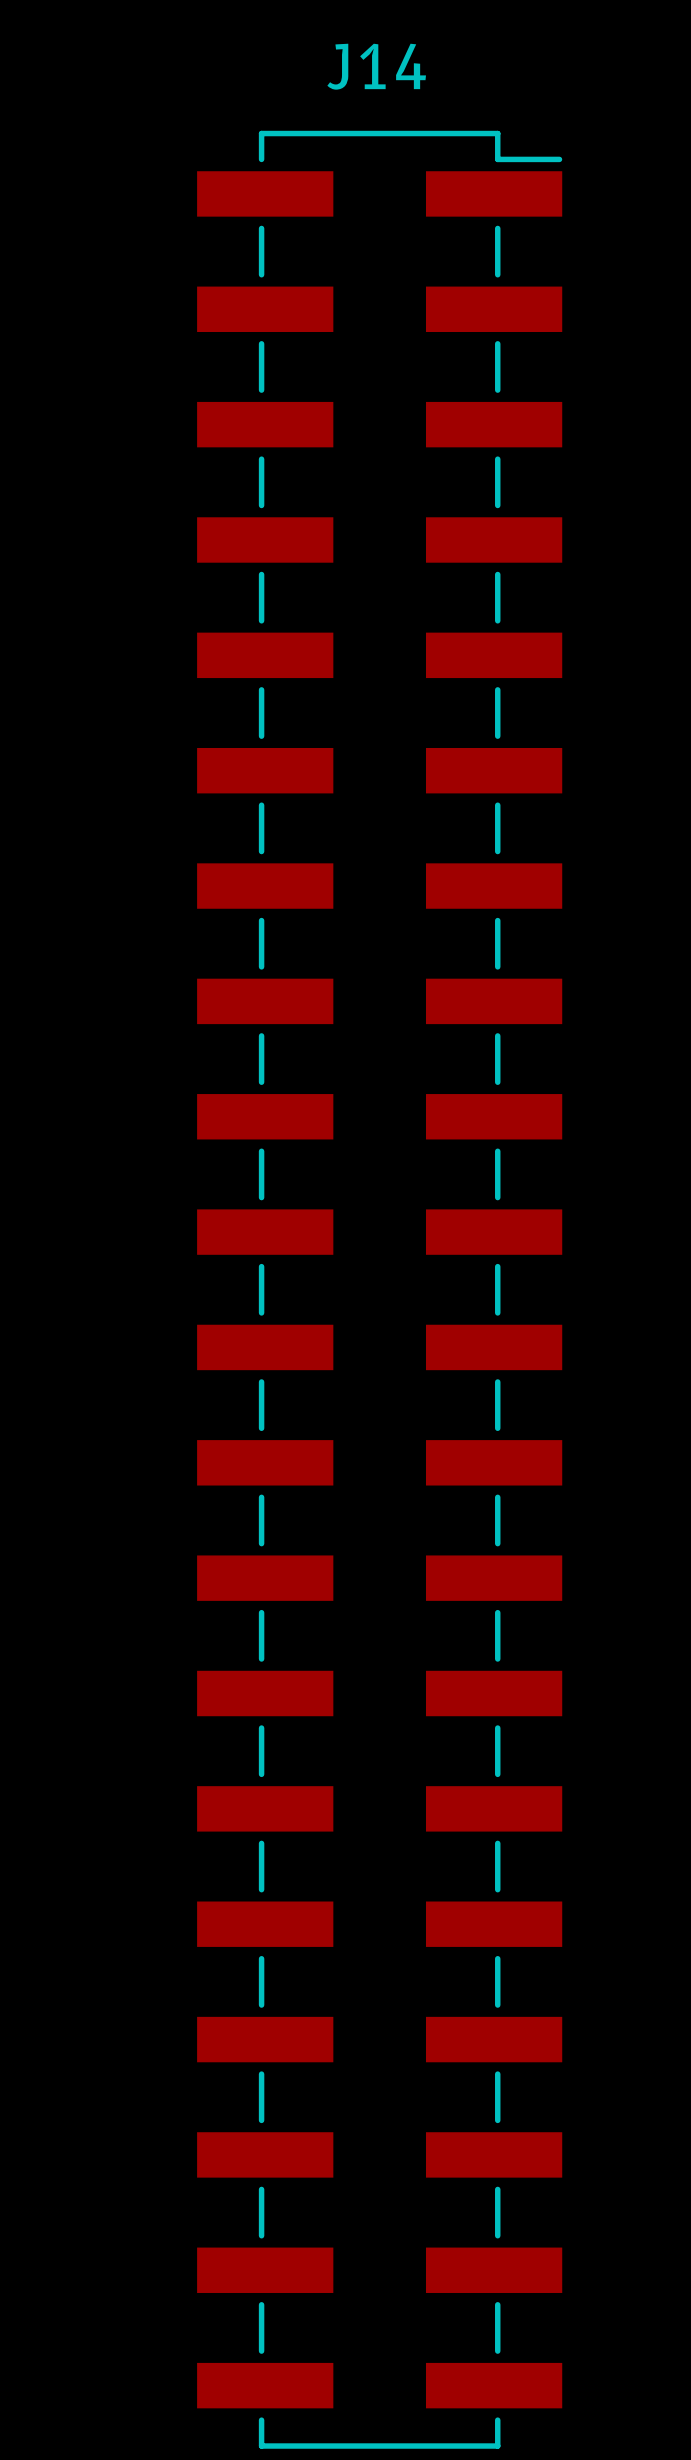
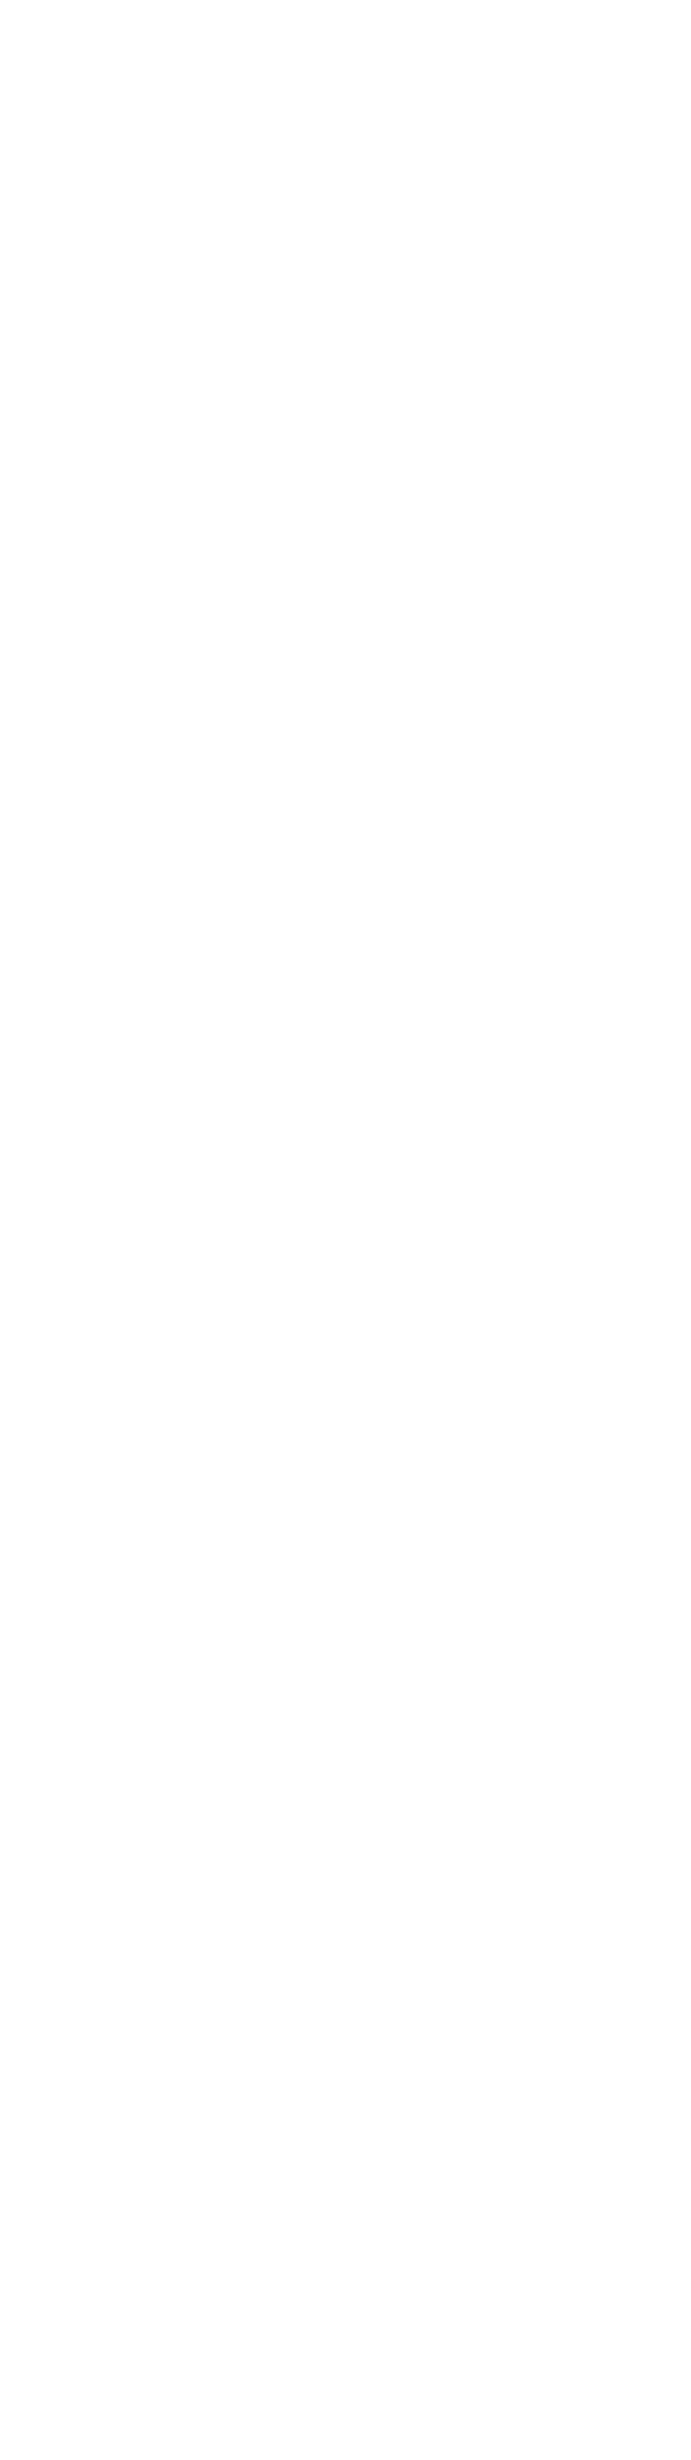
J14: (379, 1289) -> none

